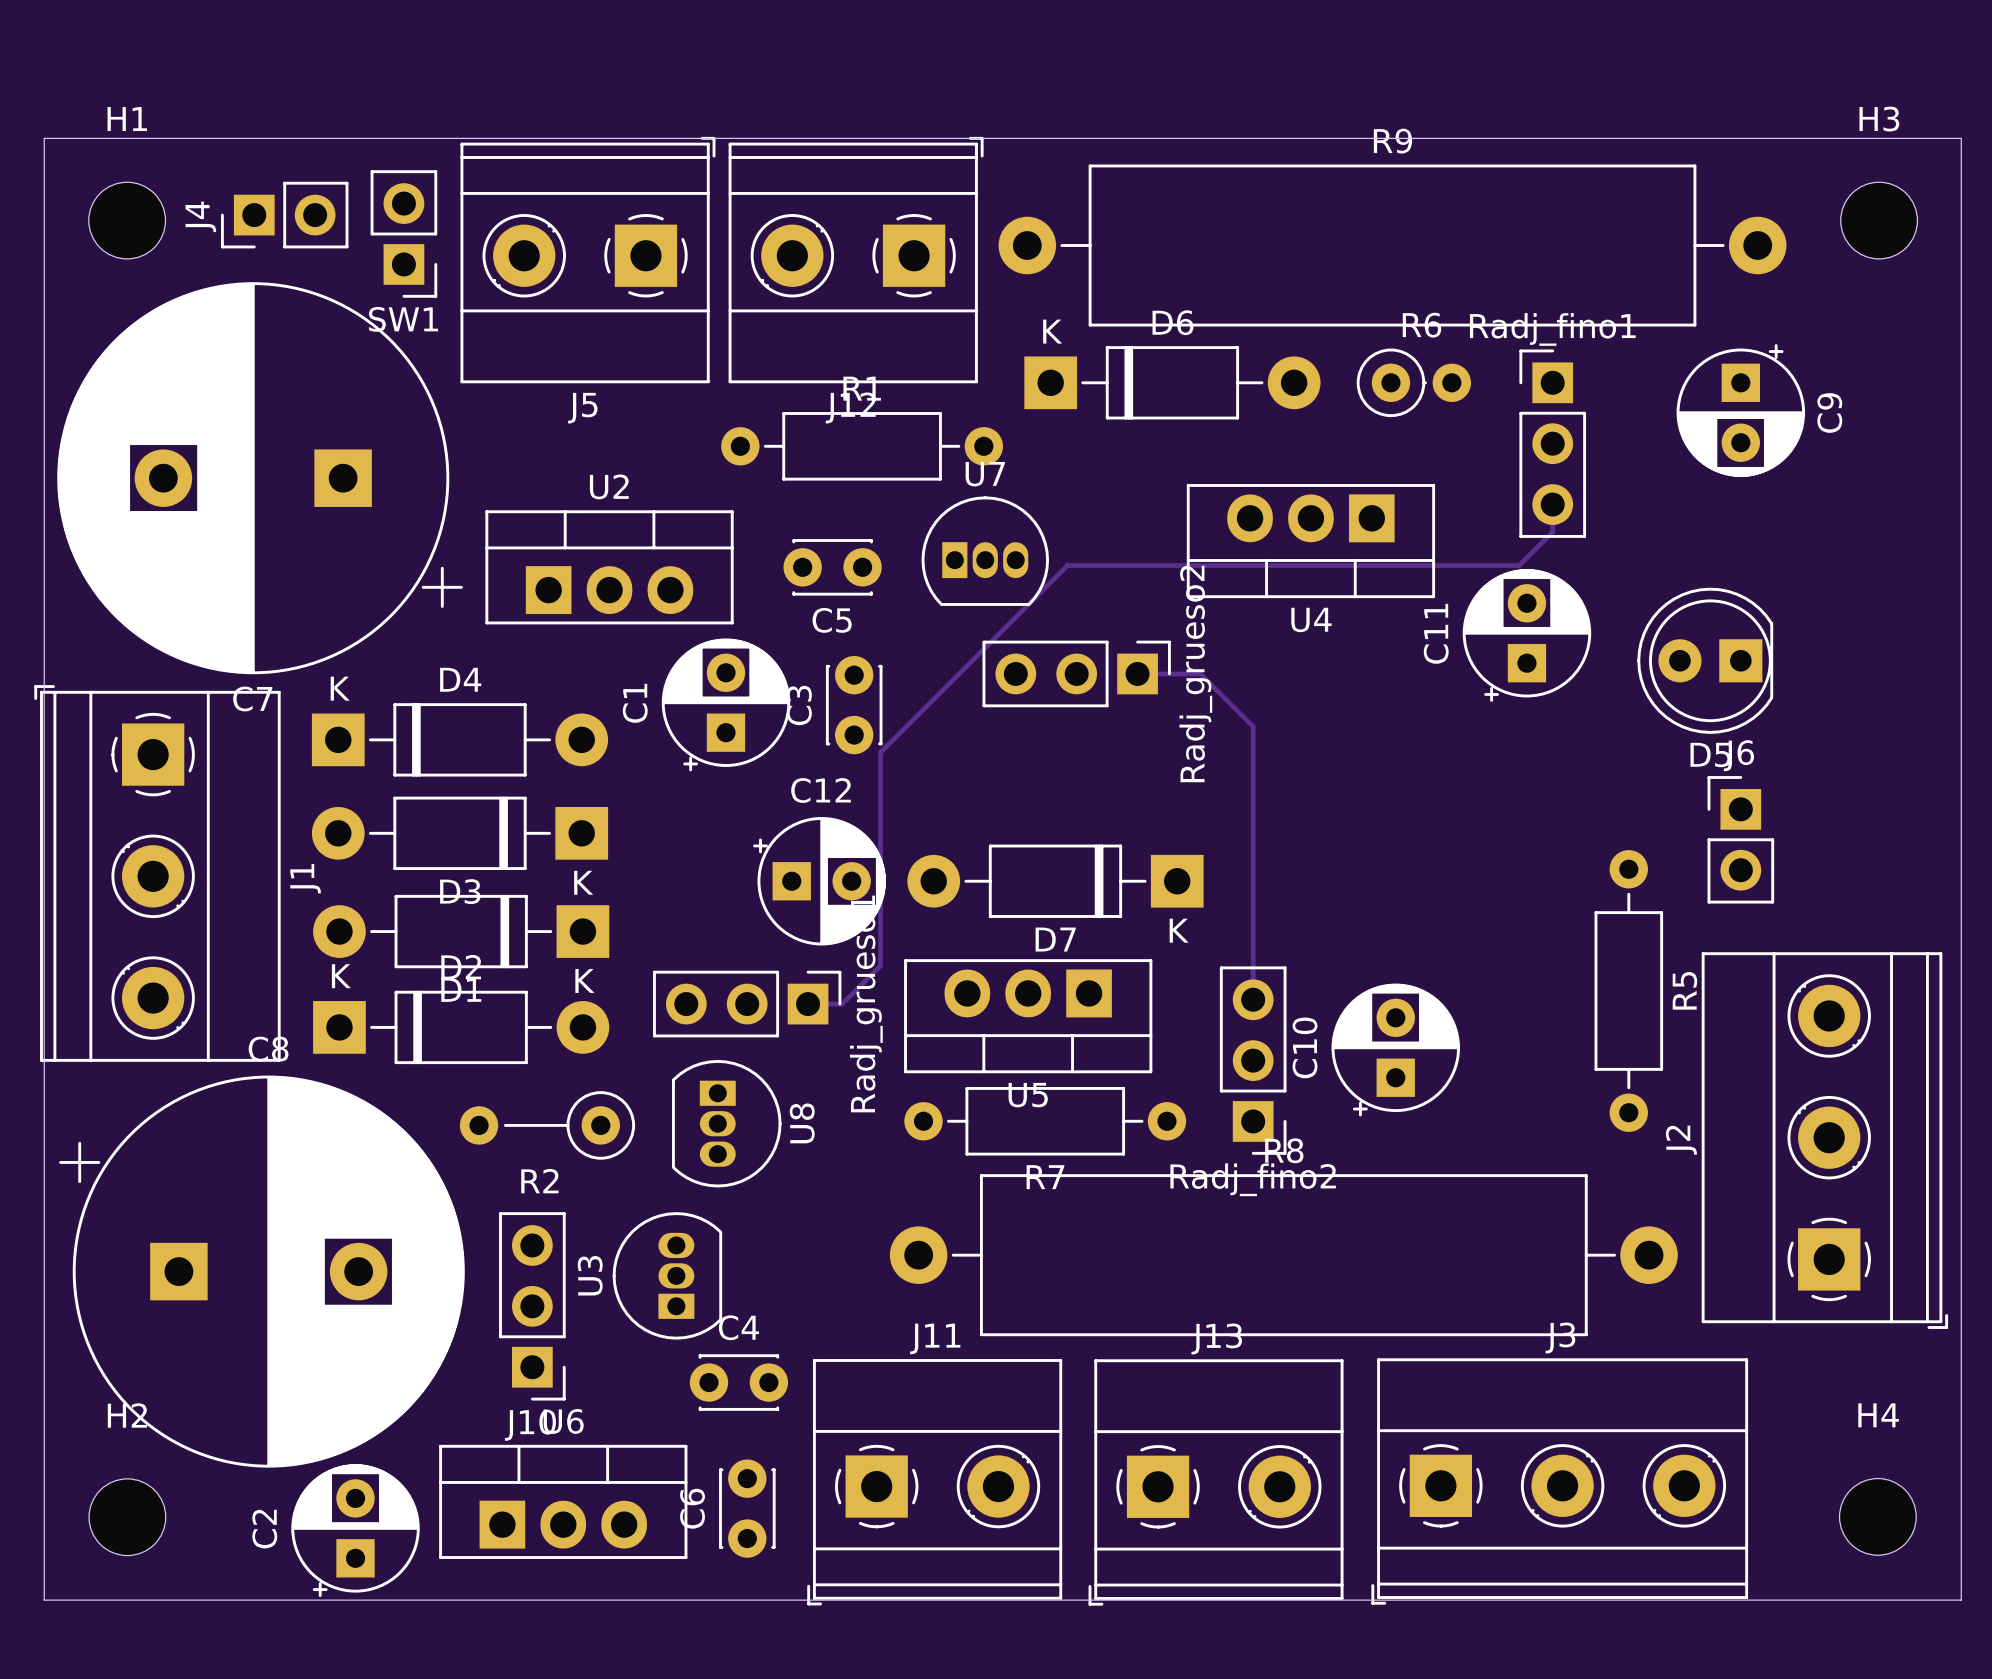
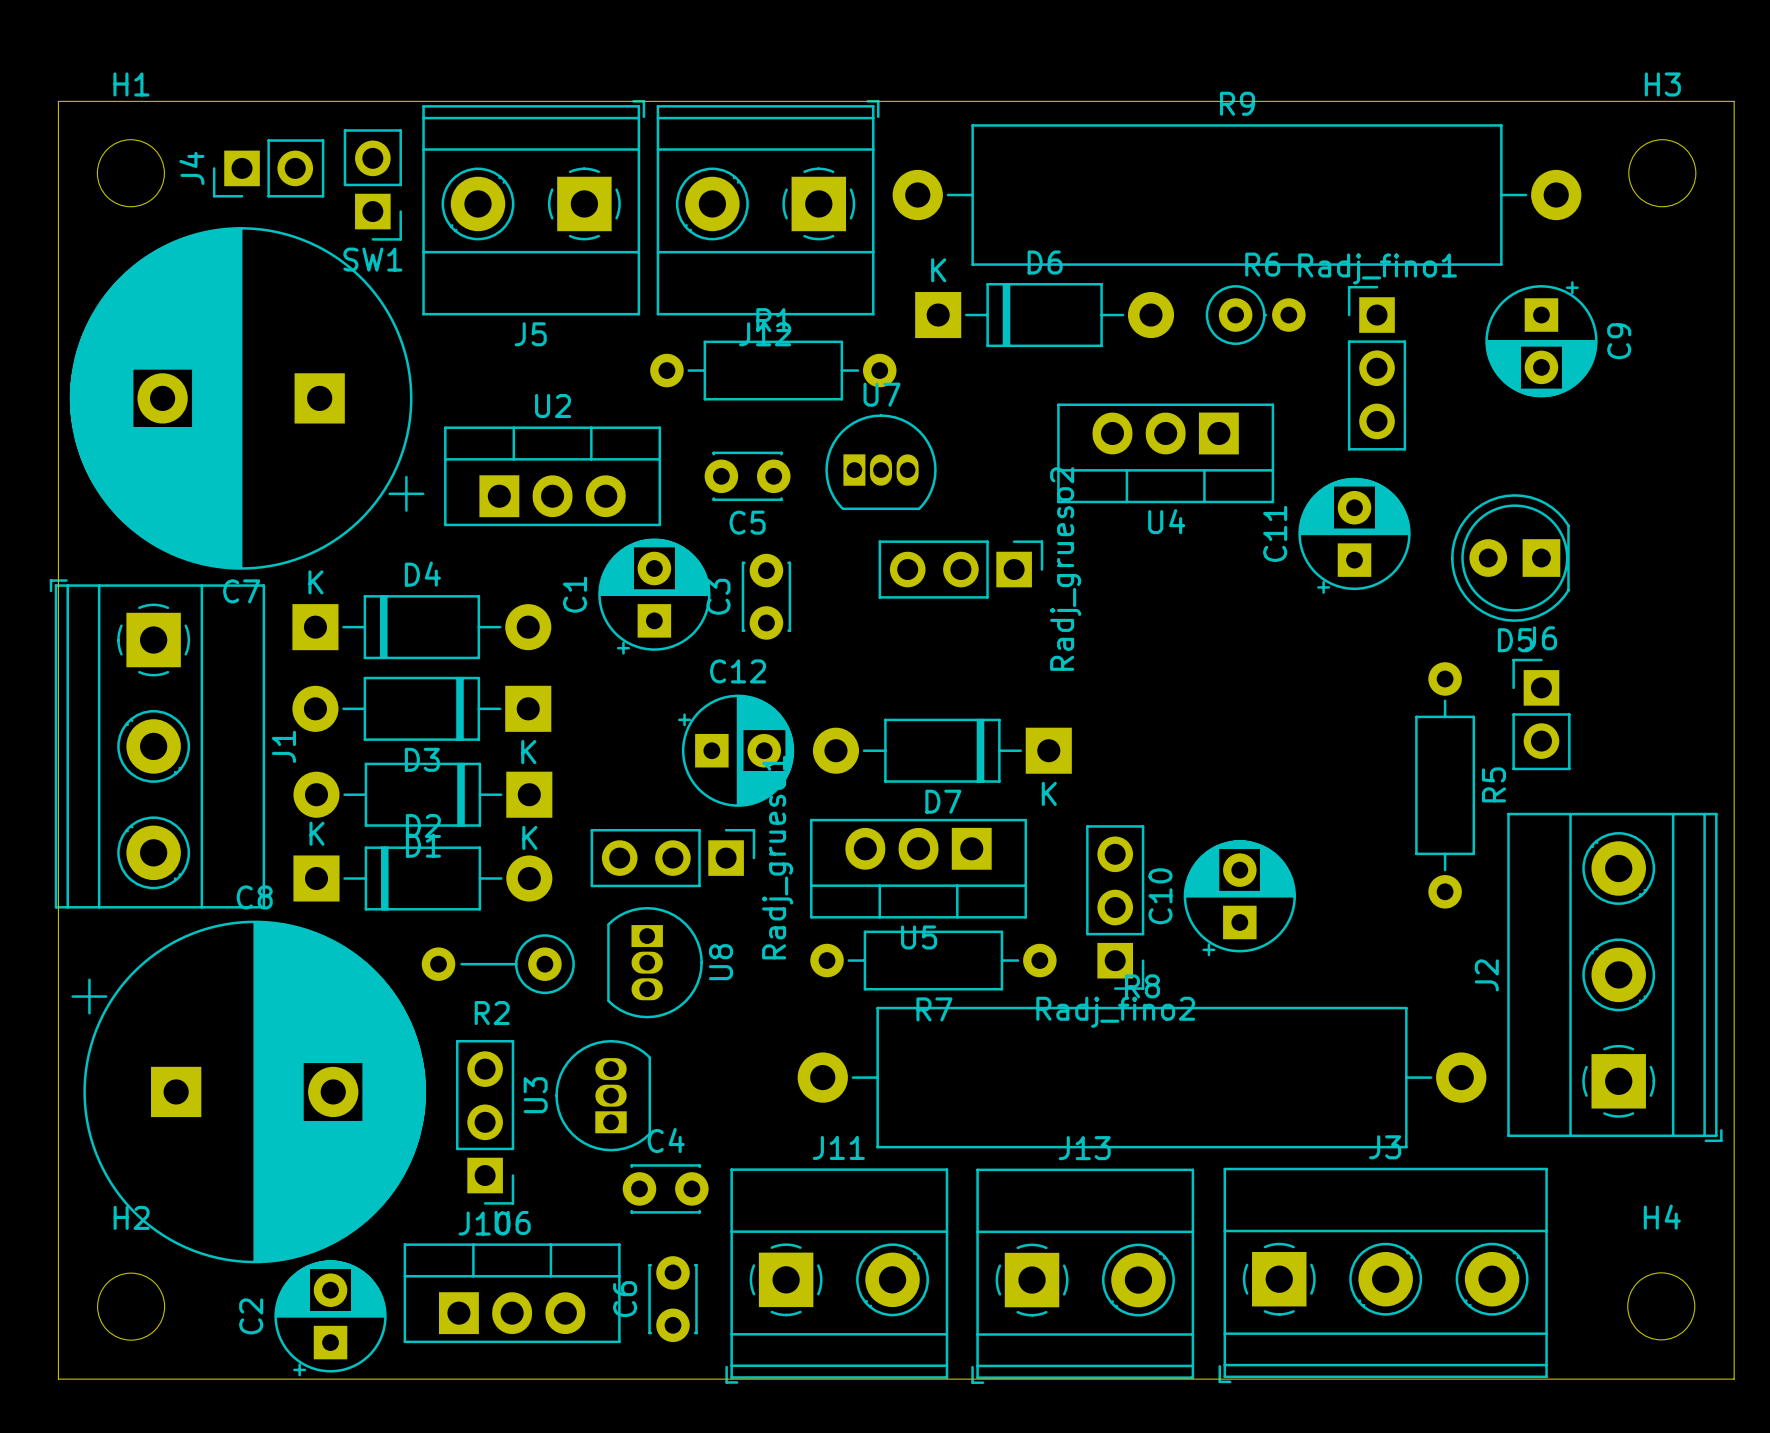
track: (1552, 504) (1552, 531) (1519, 565) (1067, 565) (880, 752) (880, 965) (842, 1004) (808, 1004) -> none
track: (1137, 673) (1200, 673) (1253, 726) (1253, 999) -> none
R5 position: (1628, 990) -> (1445, 785)

